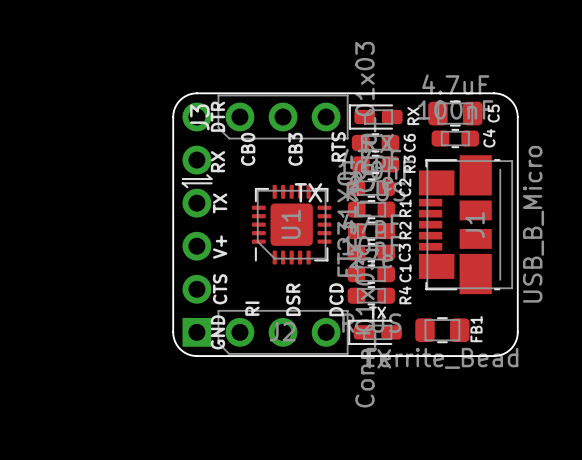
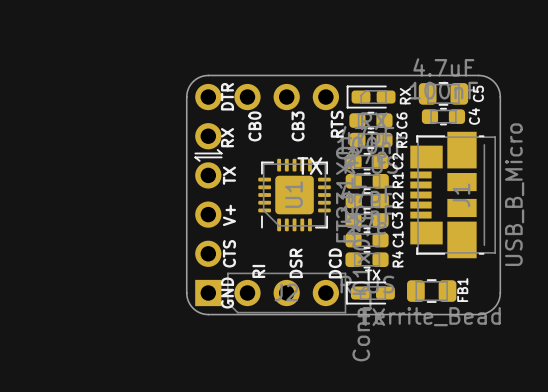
J3 side: top (283, 117) -> bottom (286, 97)

